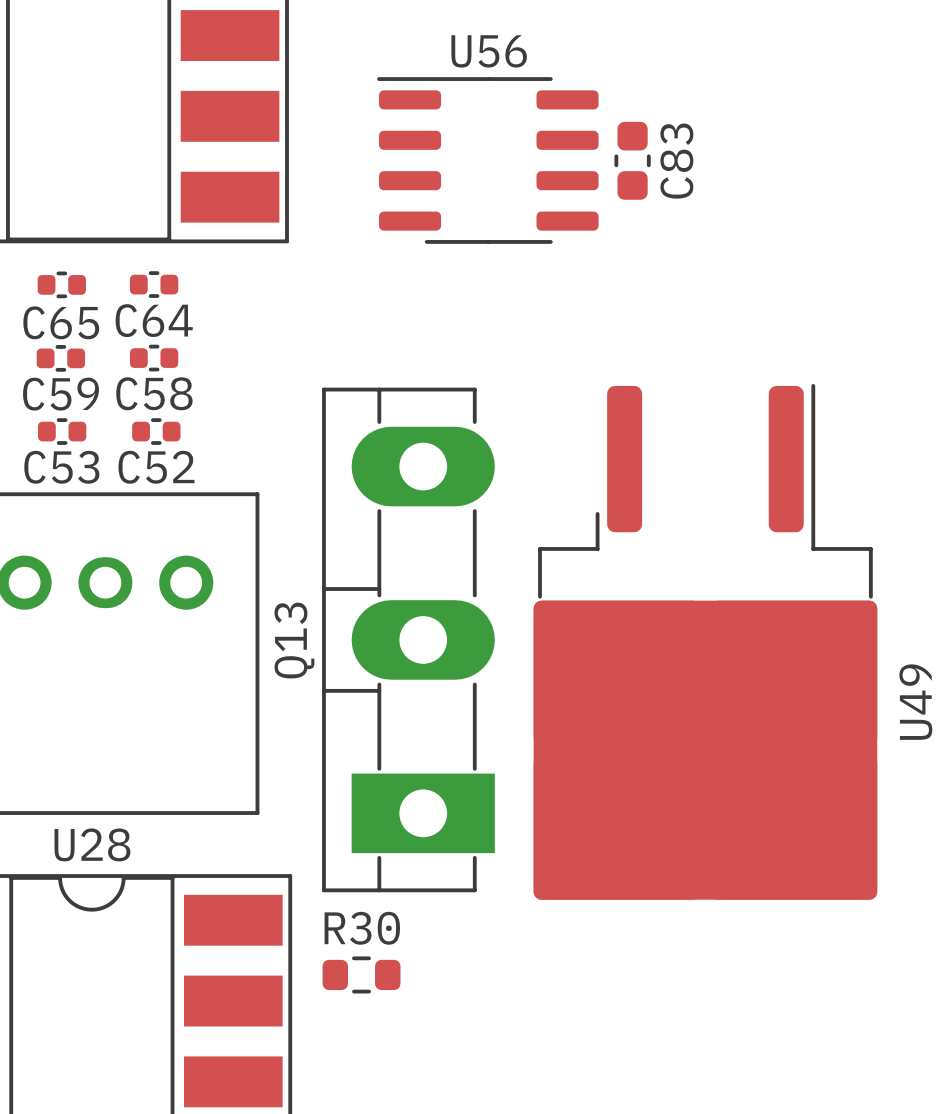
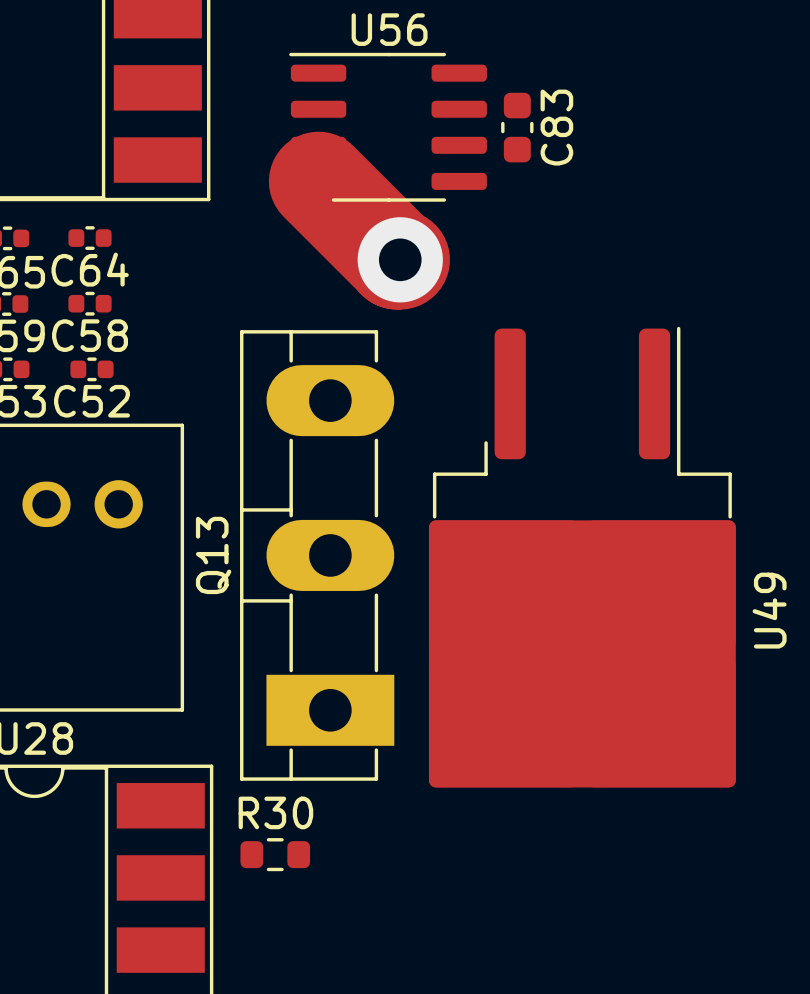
track: none -> (318, 145) (318, 181) (397, 259) (400, 259)
via: none -> (400, 259)

